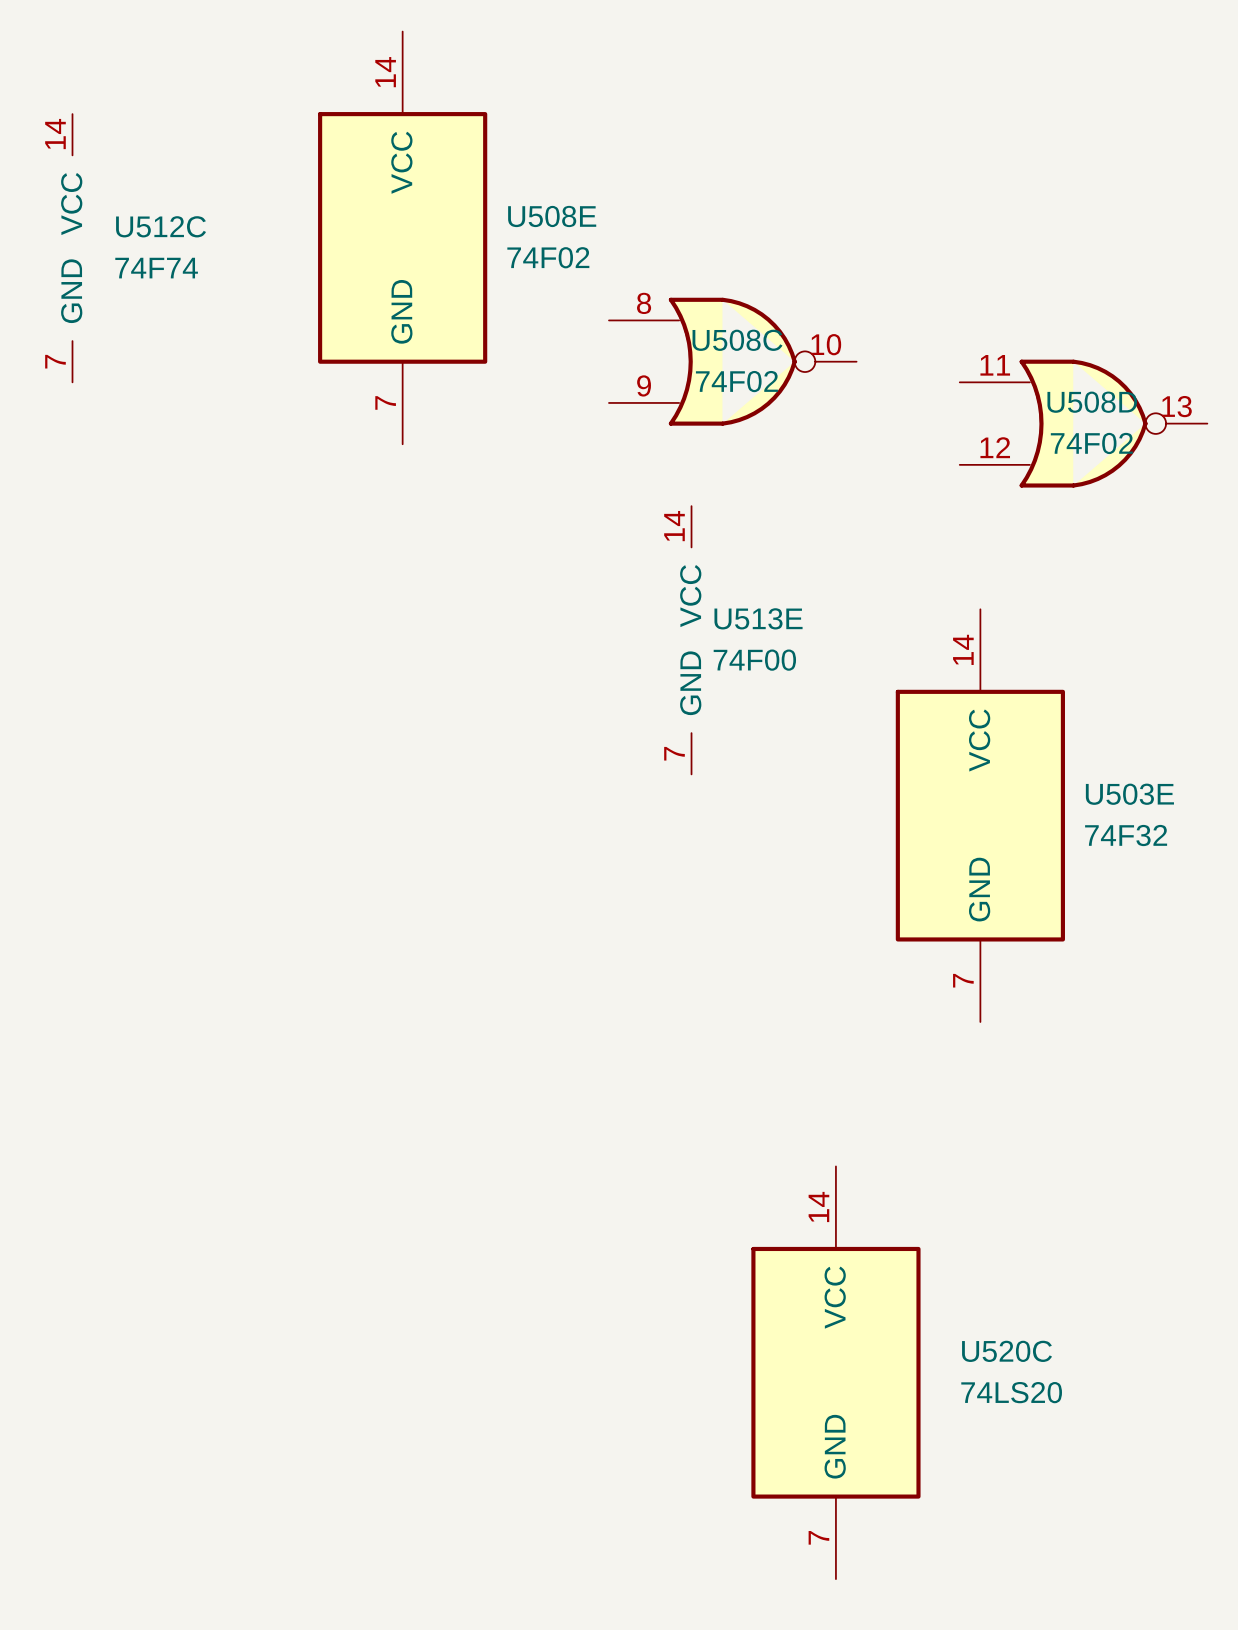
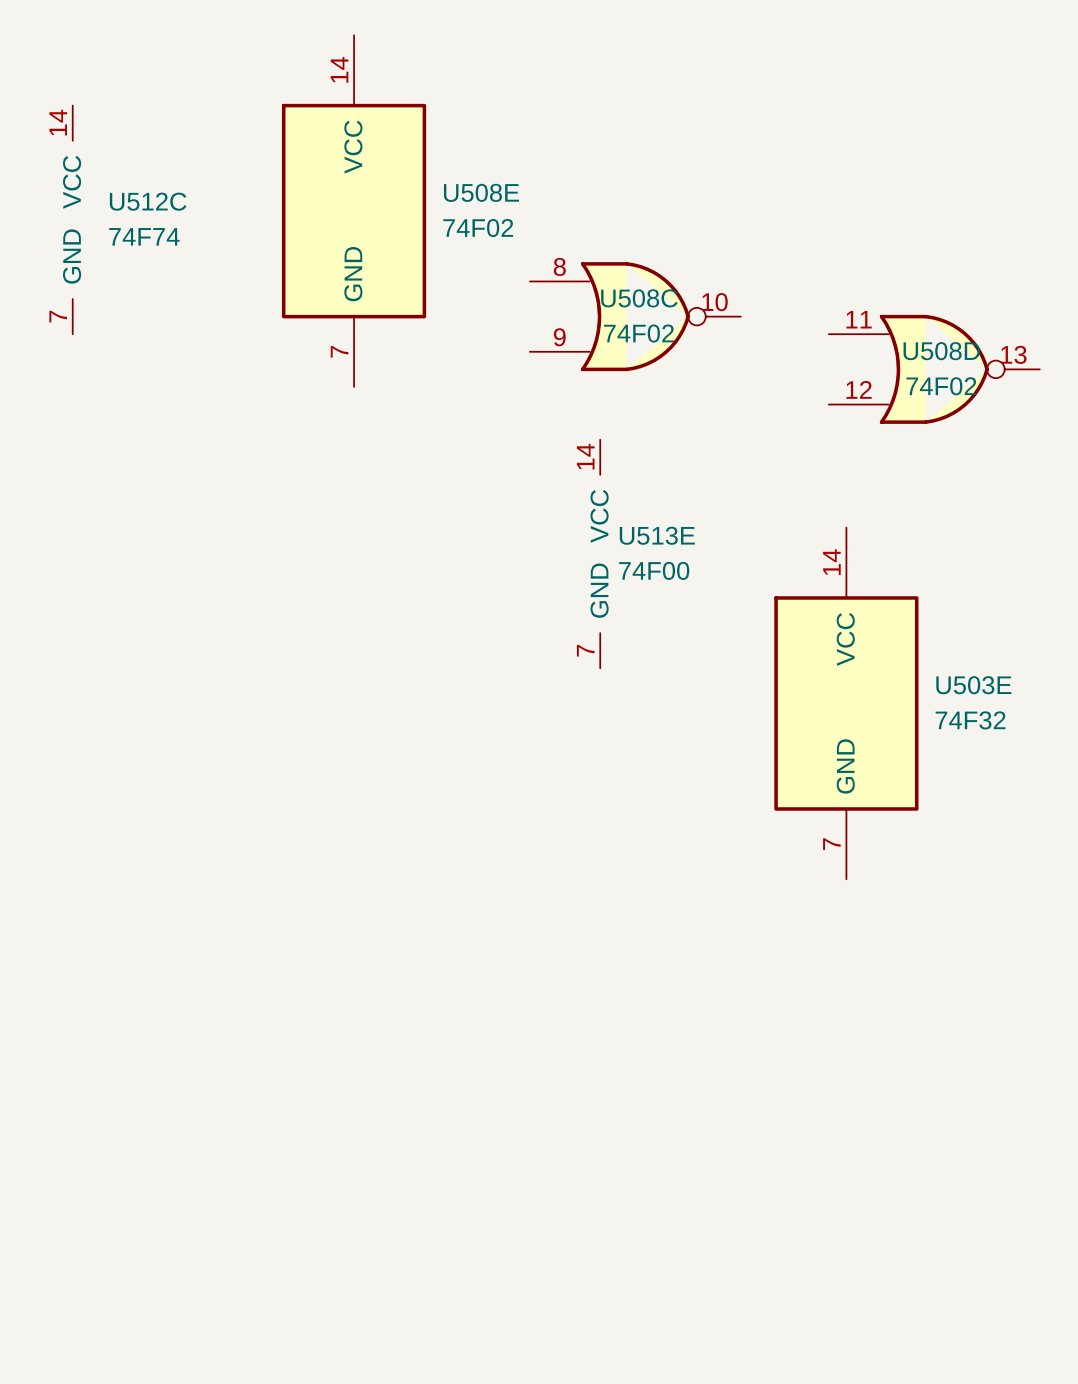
U520C: 74LS20 (835, 1372) -> none

